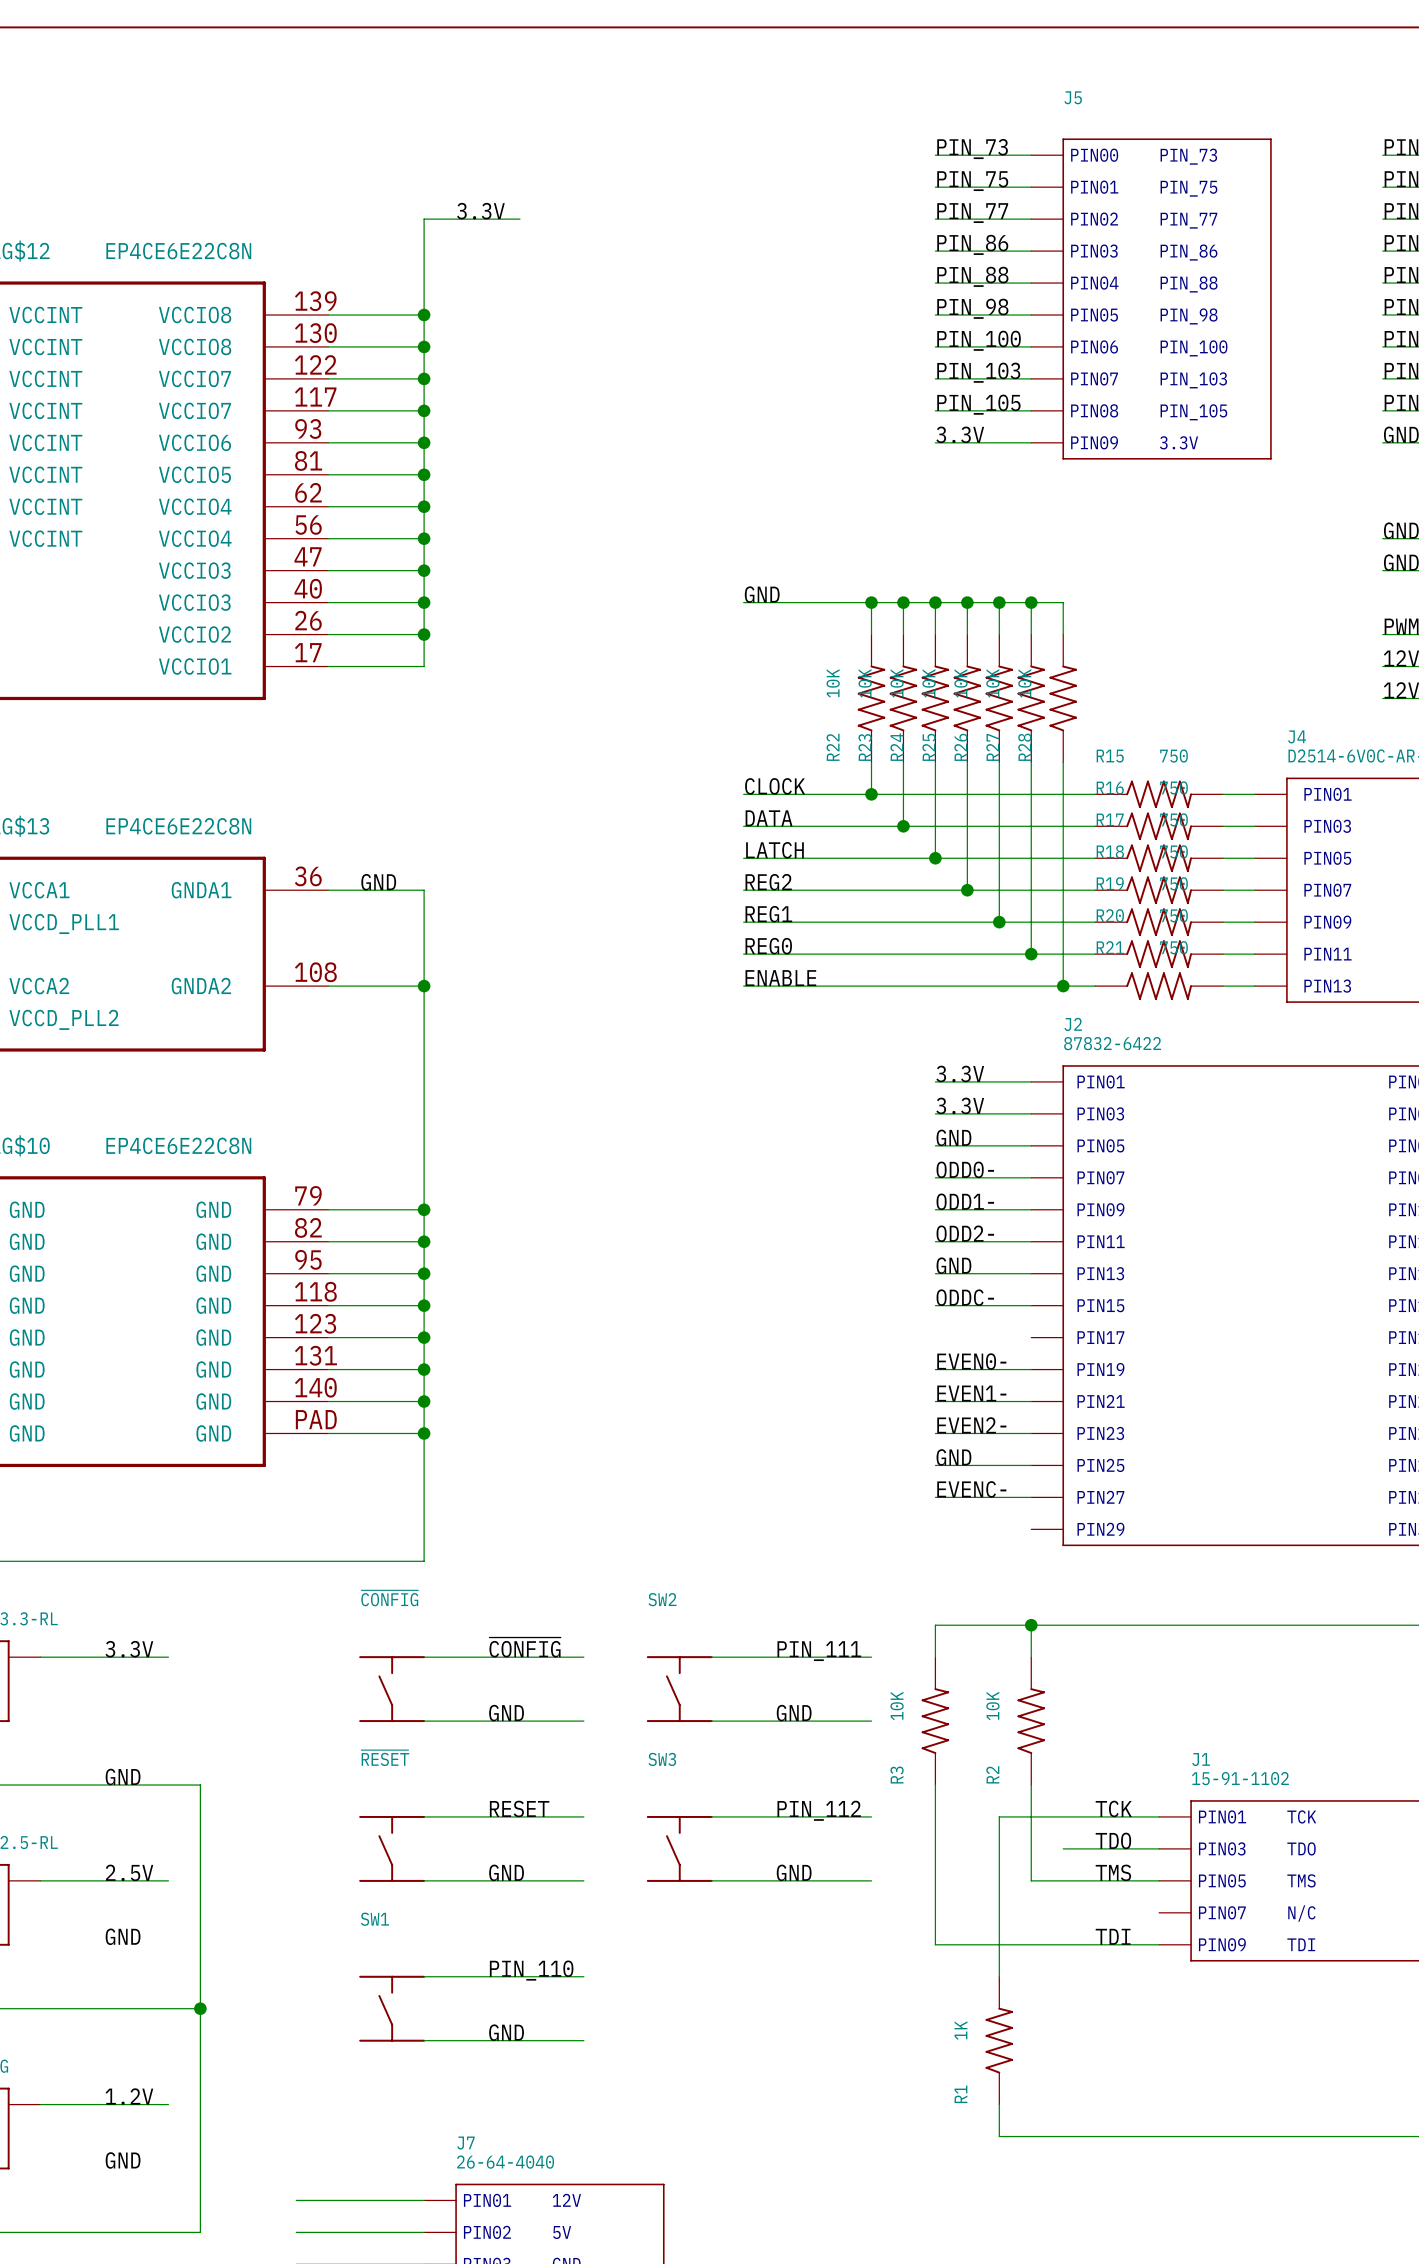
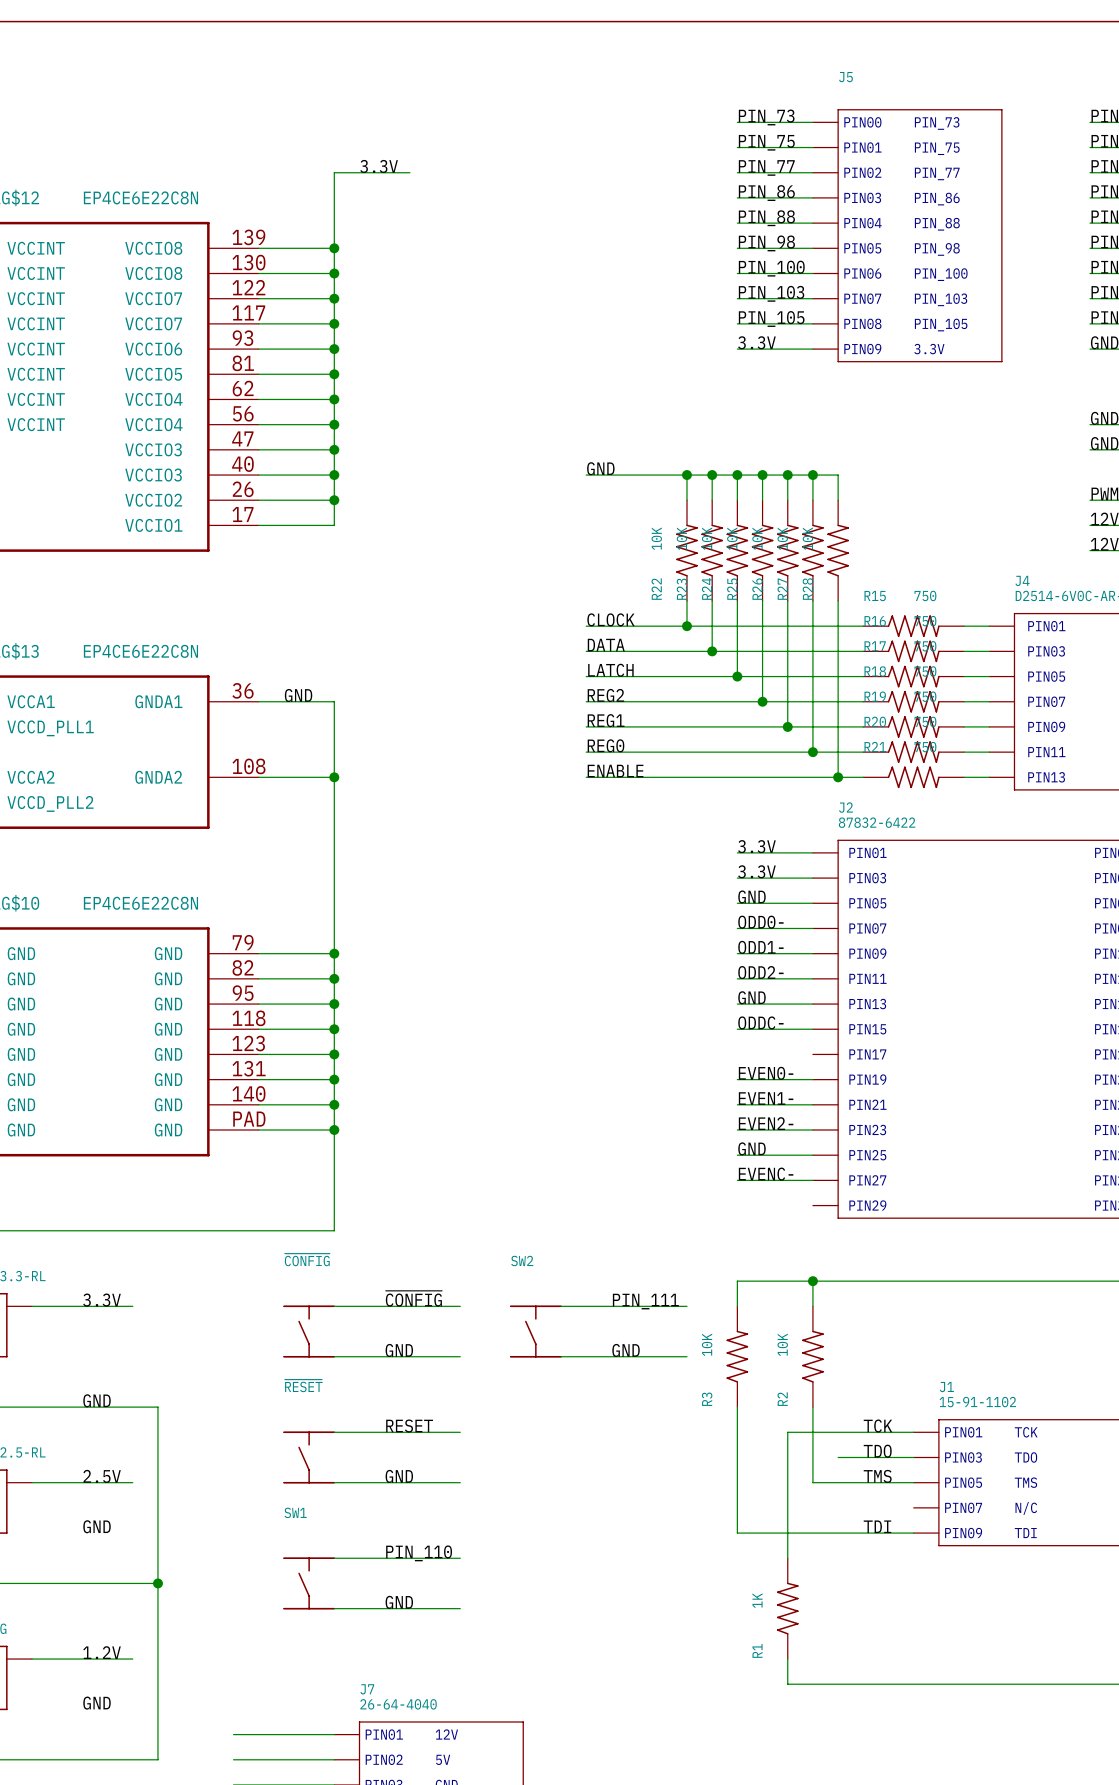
label: PIN_112 (819, 1810) -> none
wire: (711, 1816) (871, 1816) -> none
SW3: (679, 1848) -> none
label: GND (794, 1872) -> none
wire: (711, 1880) (871, 1880) -> none

